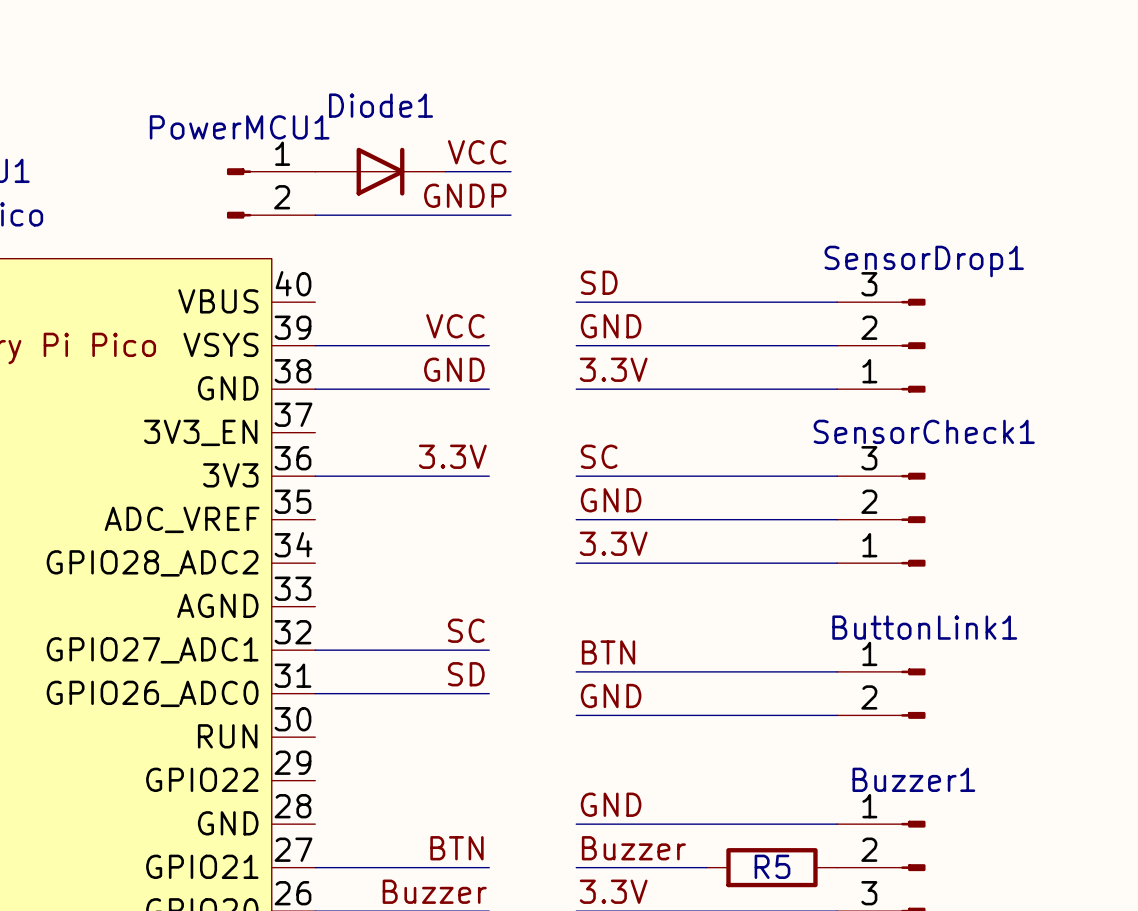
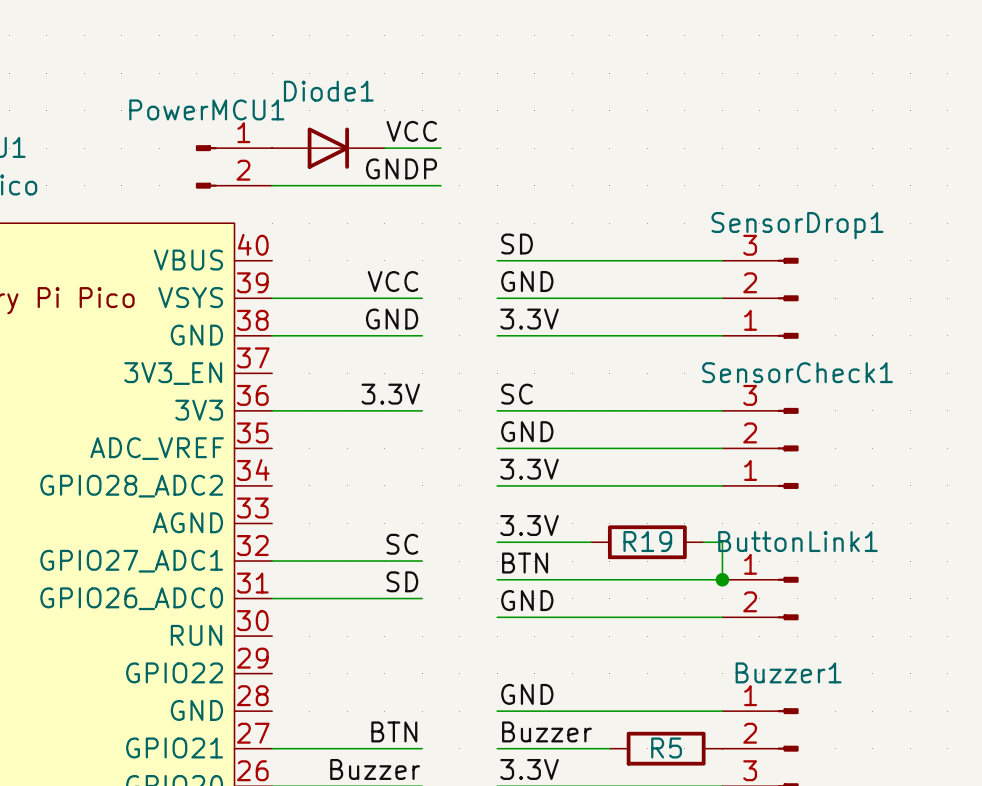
label: none -> 3.3V (529, 525)
wire: none -> (497, 542) (591, 542)
R19: none -> (647, 542)
wire: none -> (703, 542) (722, 542) (722, 579)
junction: none -> (722, 579)

